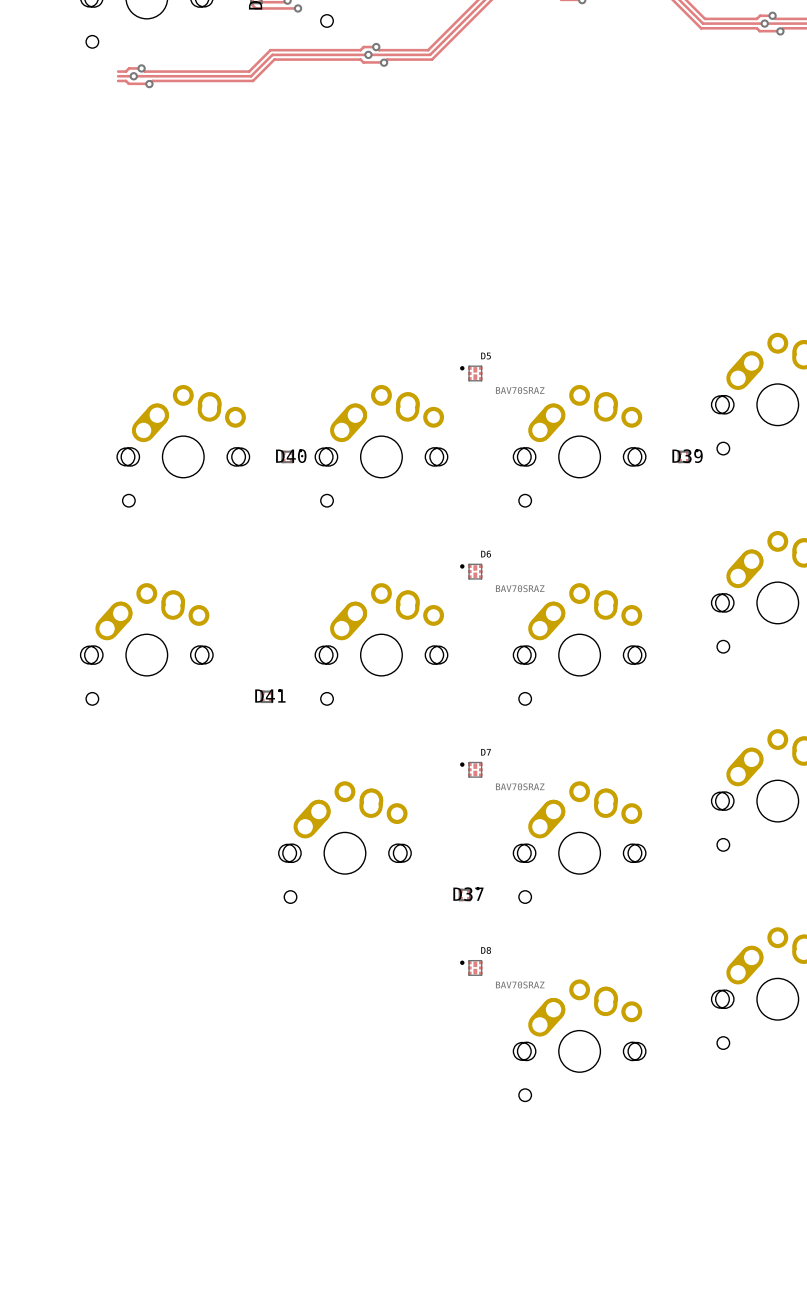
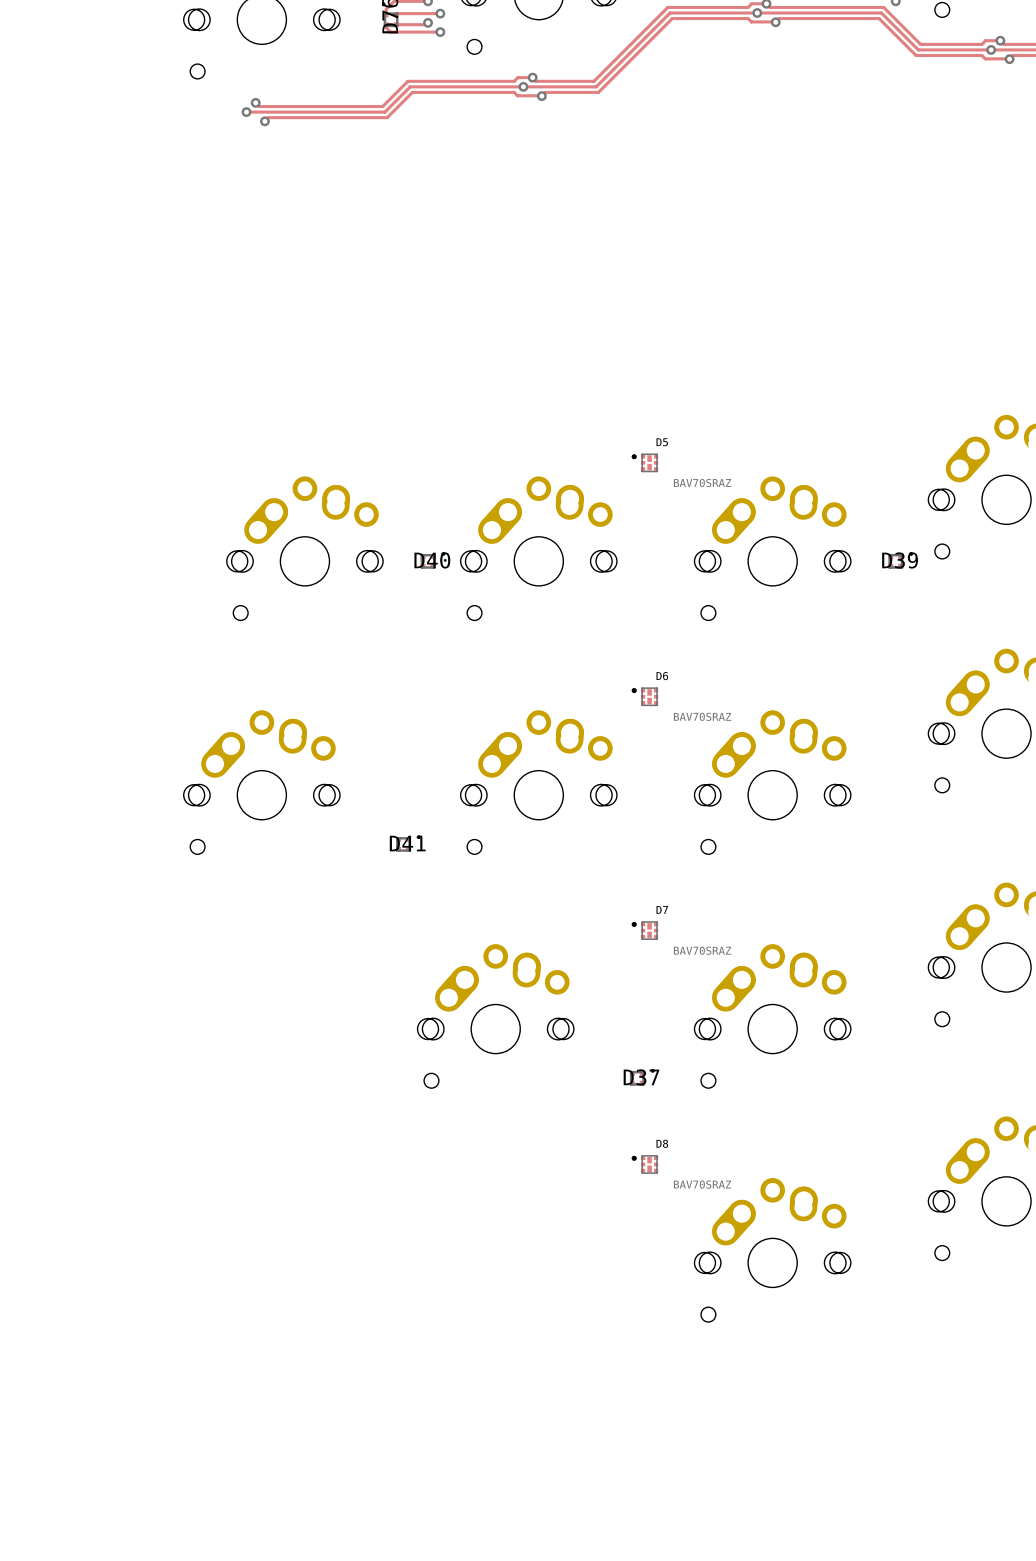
track: (141, 68) (129, 68) (125, 71) (118, 71) -> none
track: (118, 76) (133, 76) -> none
track: (118, 80) (125, 80) (128, 83) (149, 84) -> none

